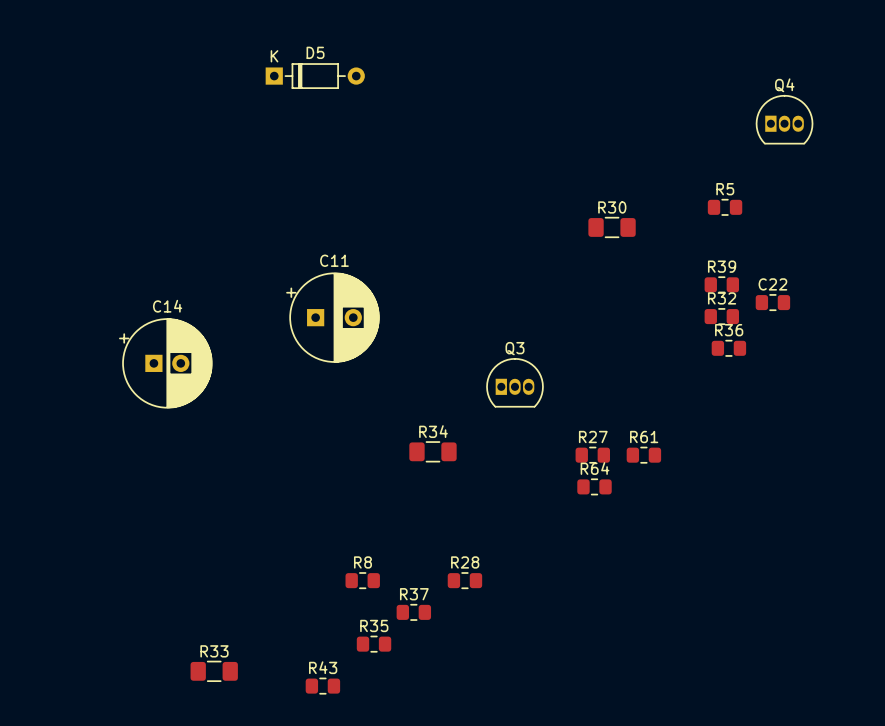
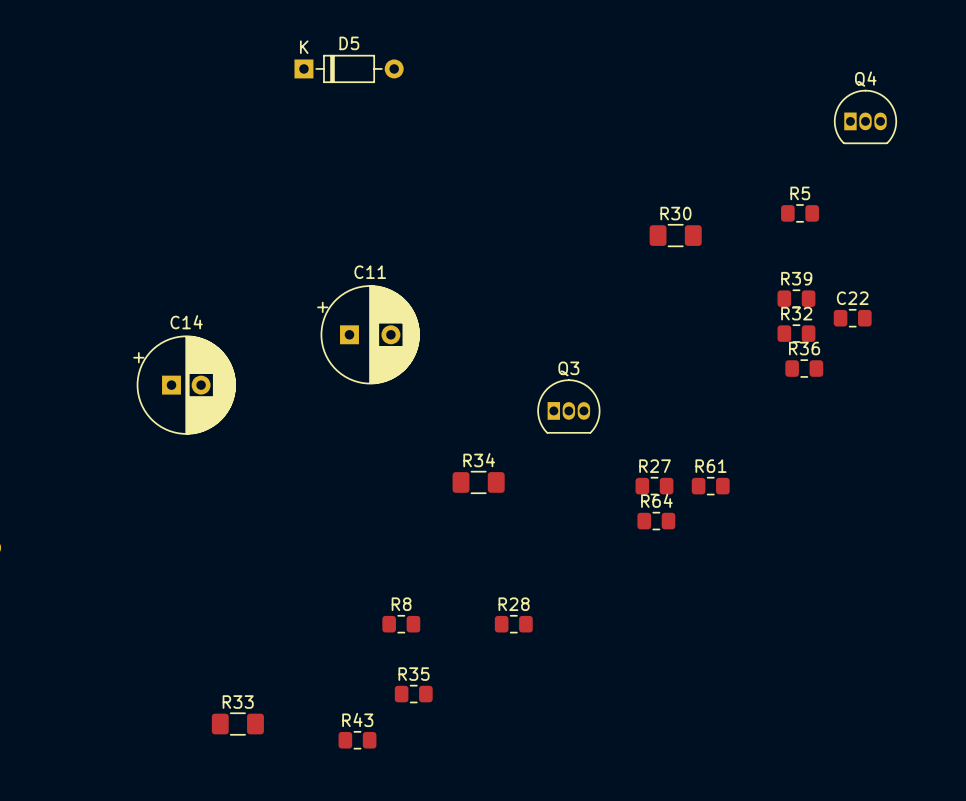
R37: (413, 612) -> none

